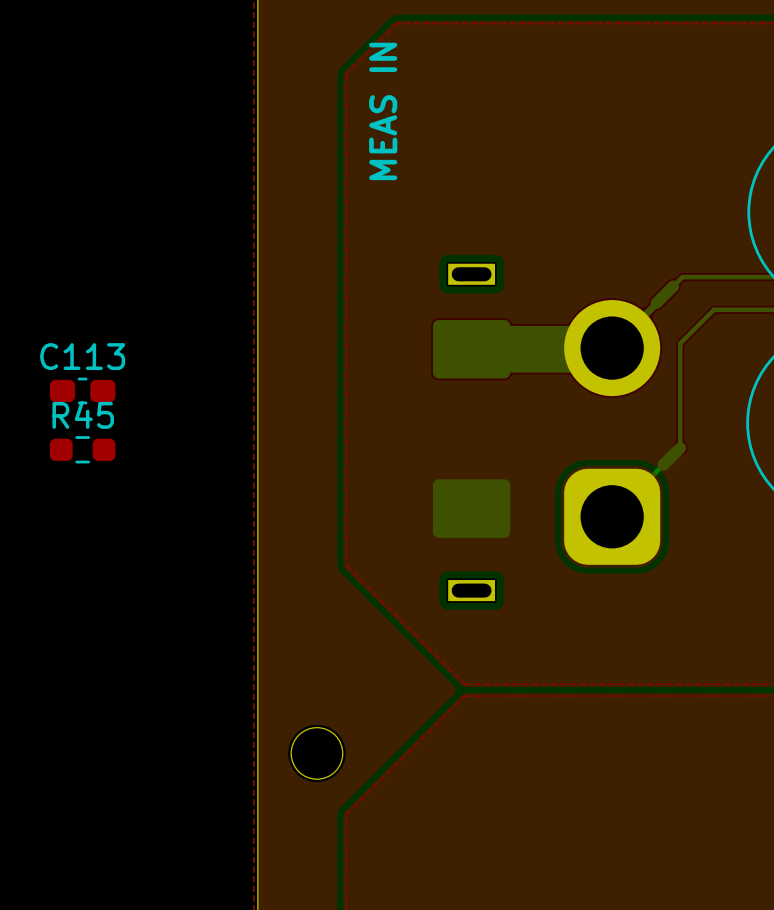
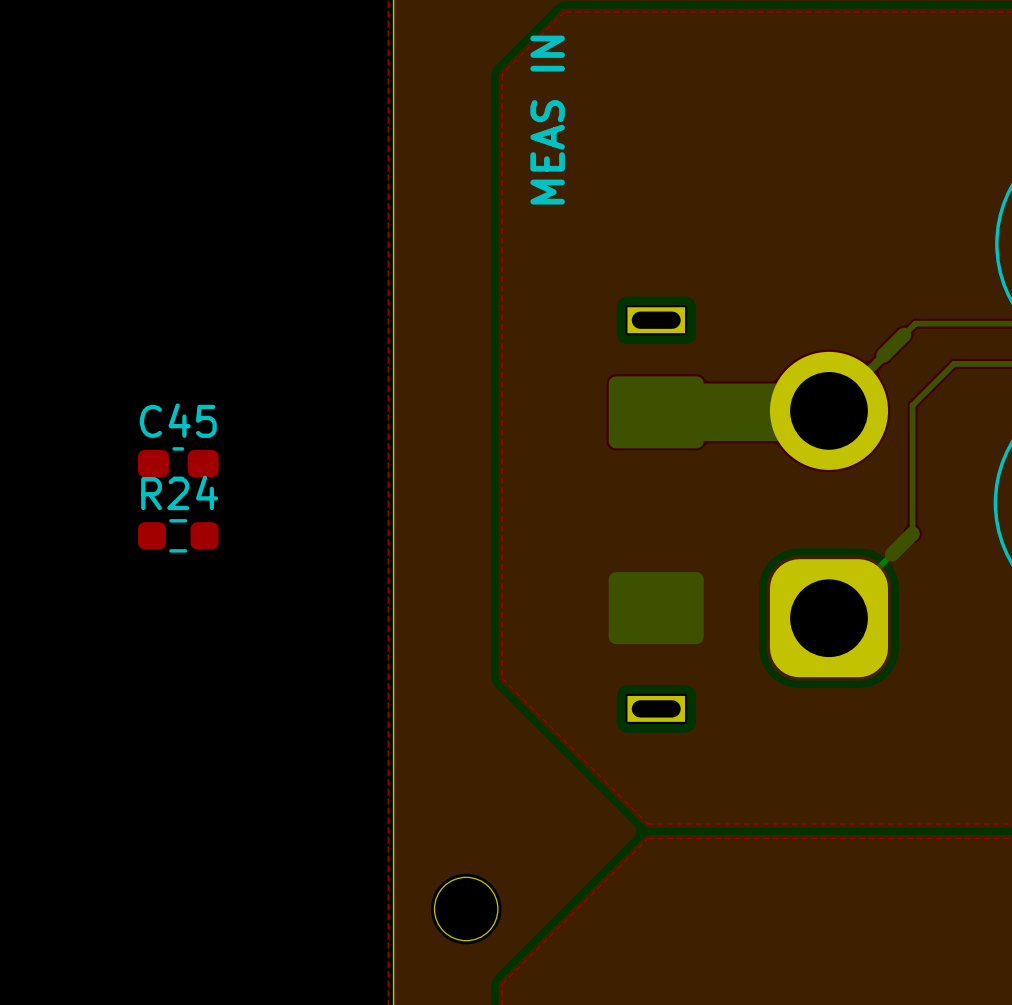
C113 name: C113 (82, 356) -> C45 (178, 420)
R45 name: R45 (83, 414) -> R24 (179, 492)

